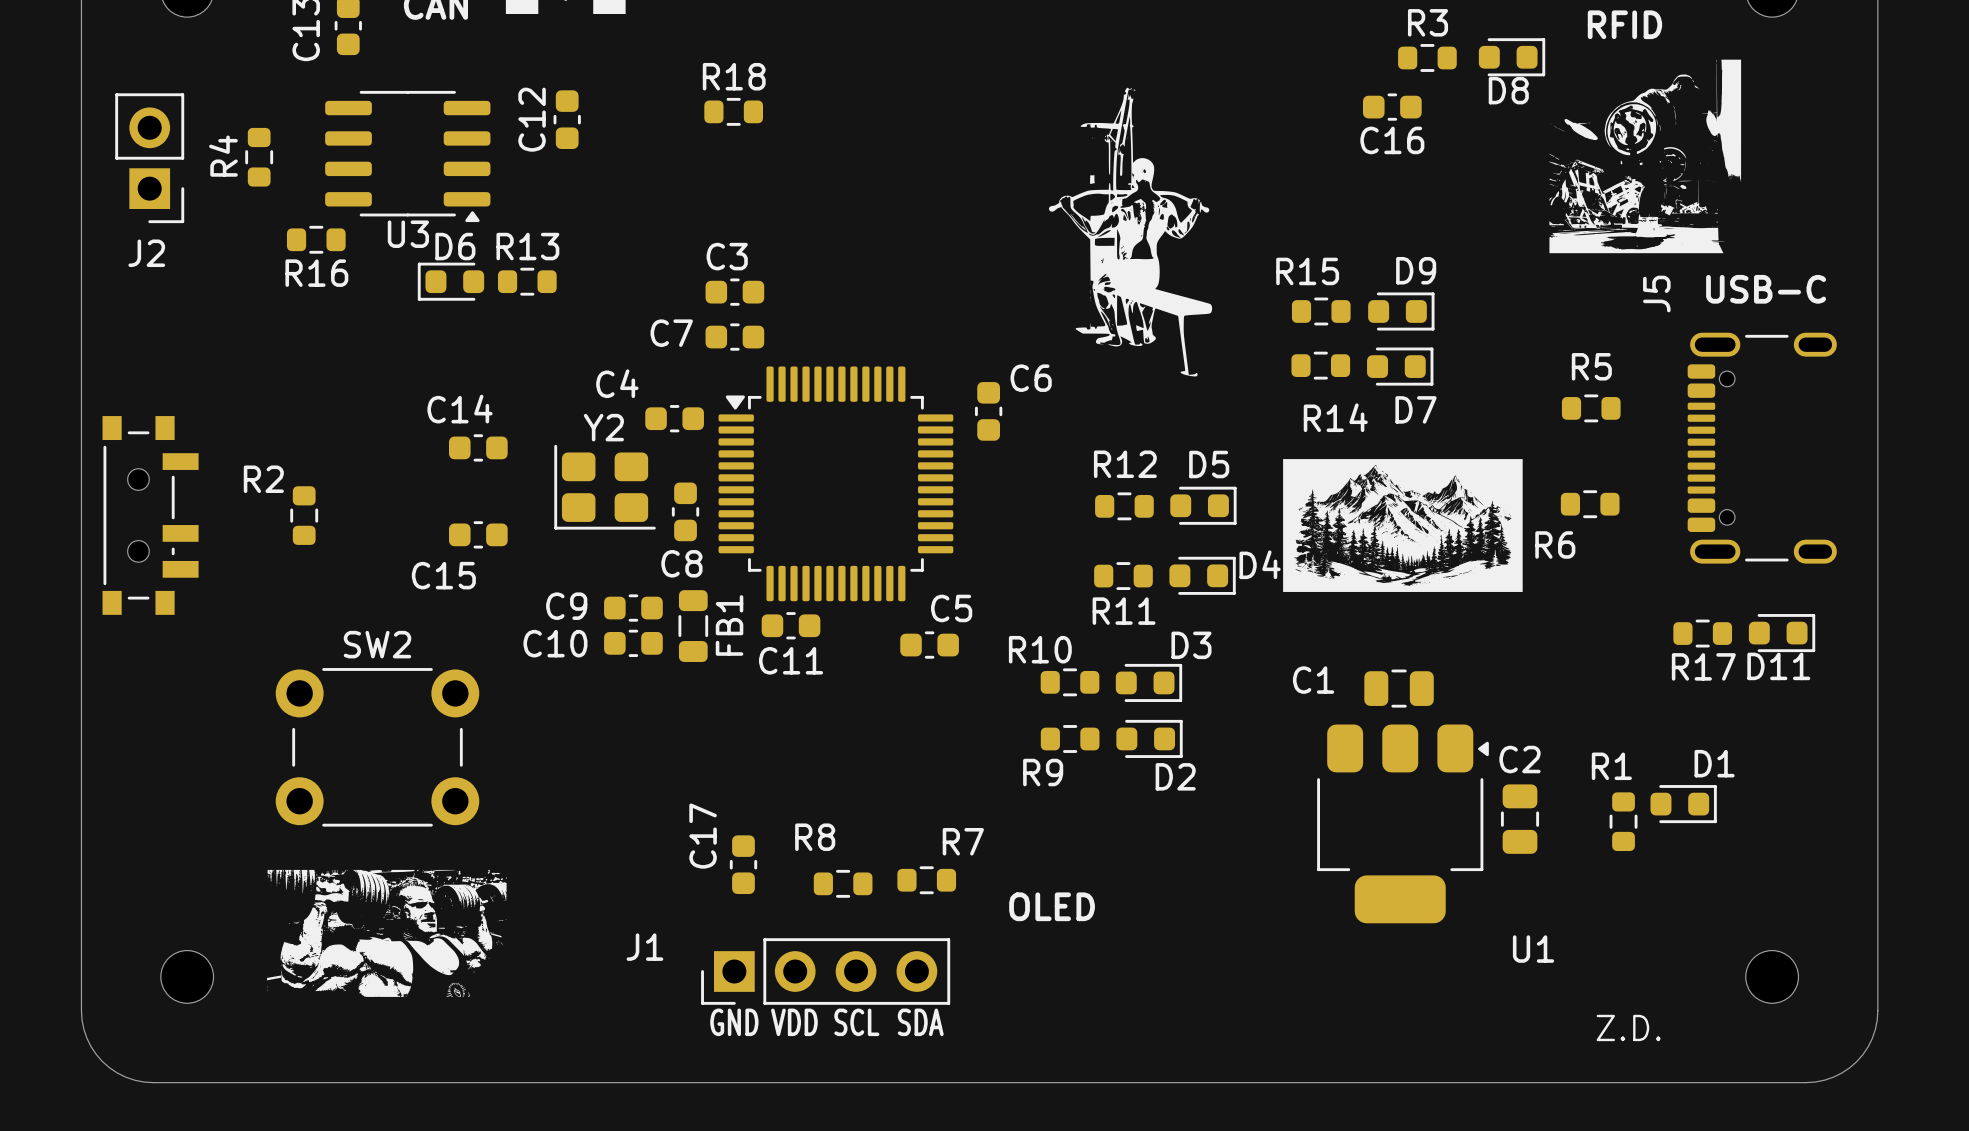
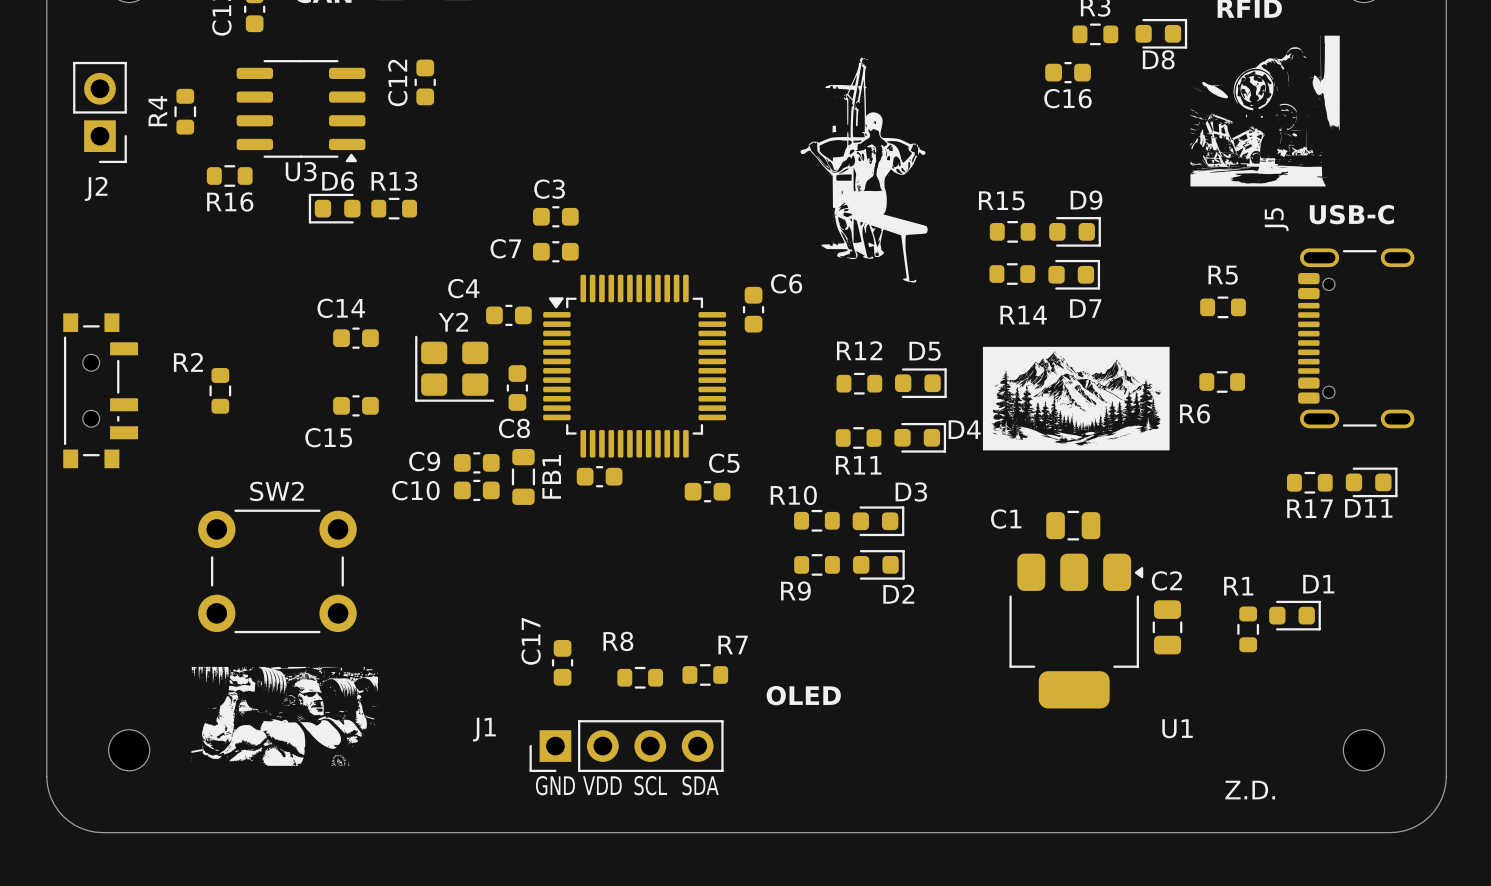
R18: (733, 111) -> none
C11 name: C11 (791, 660) -> none

